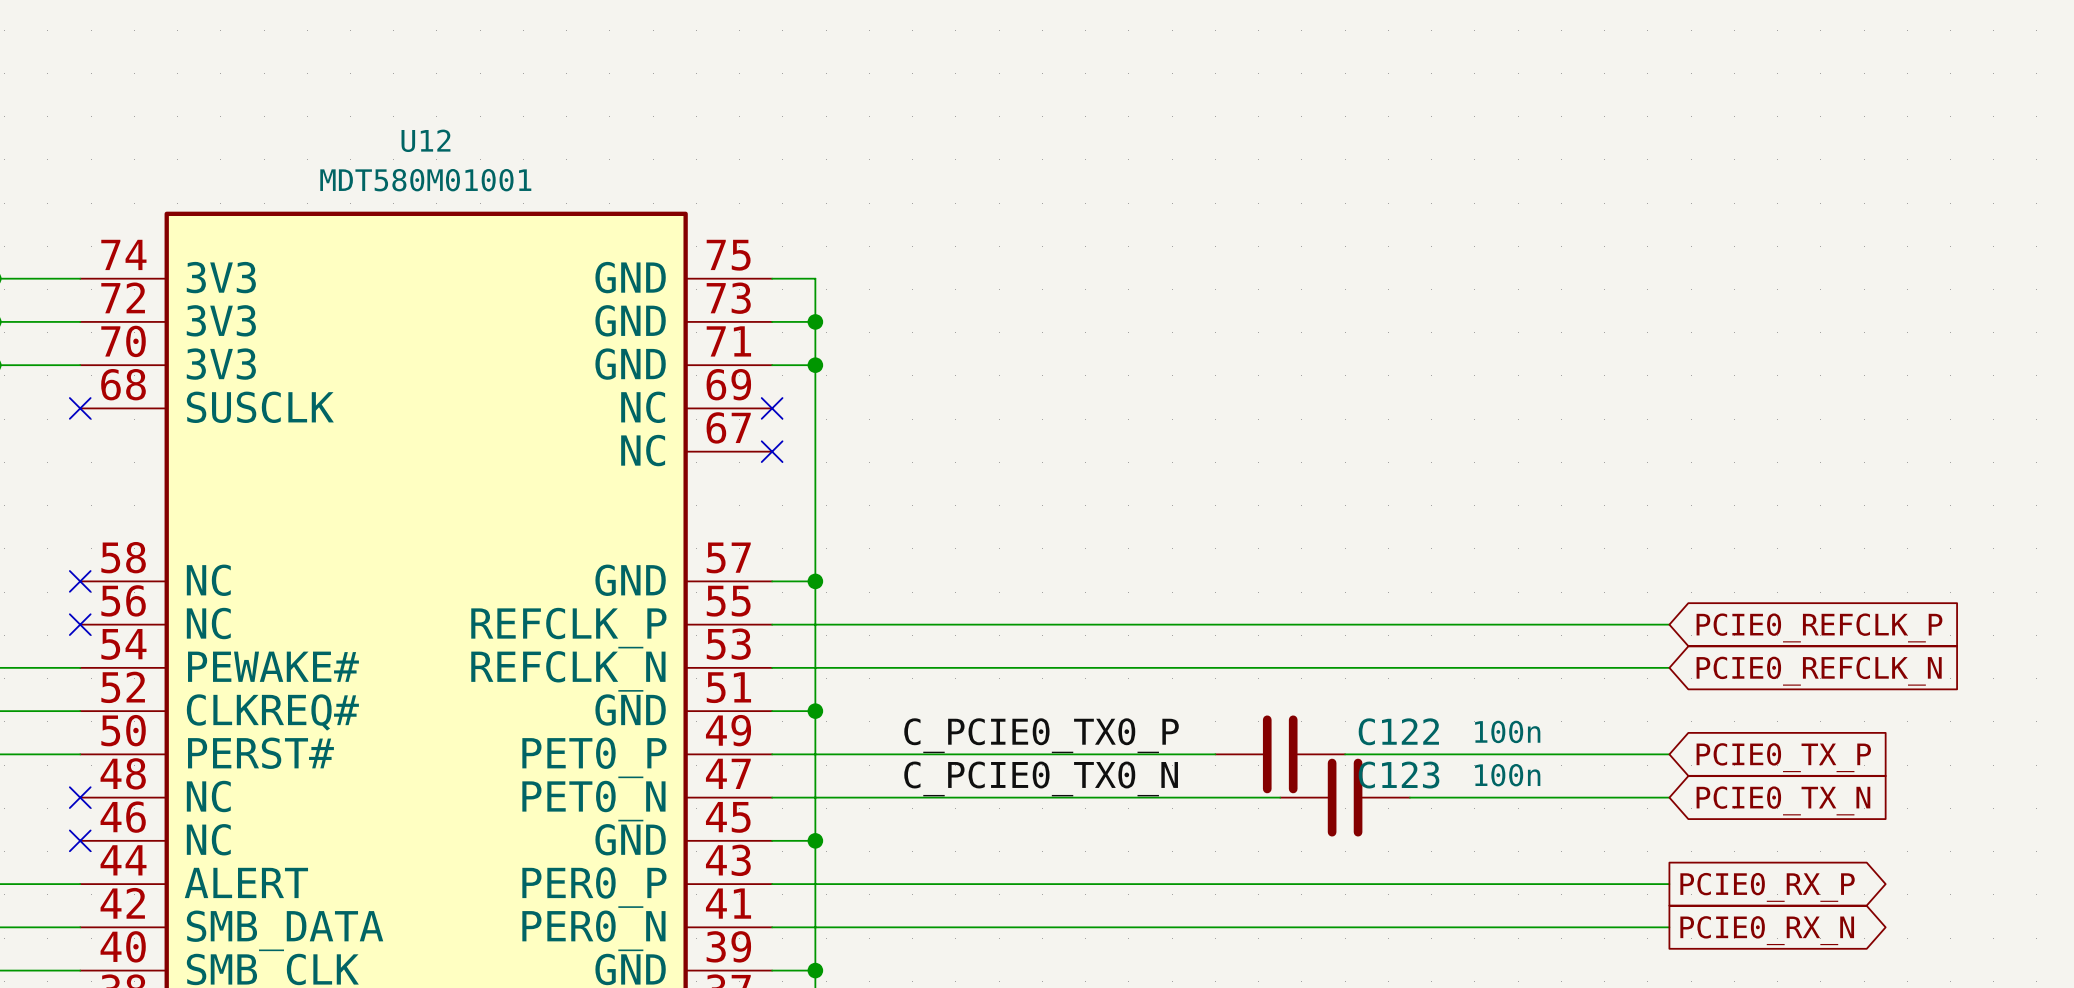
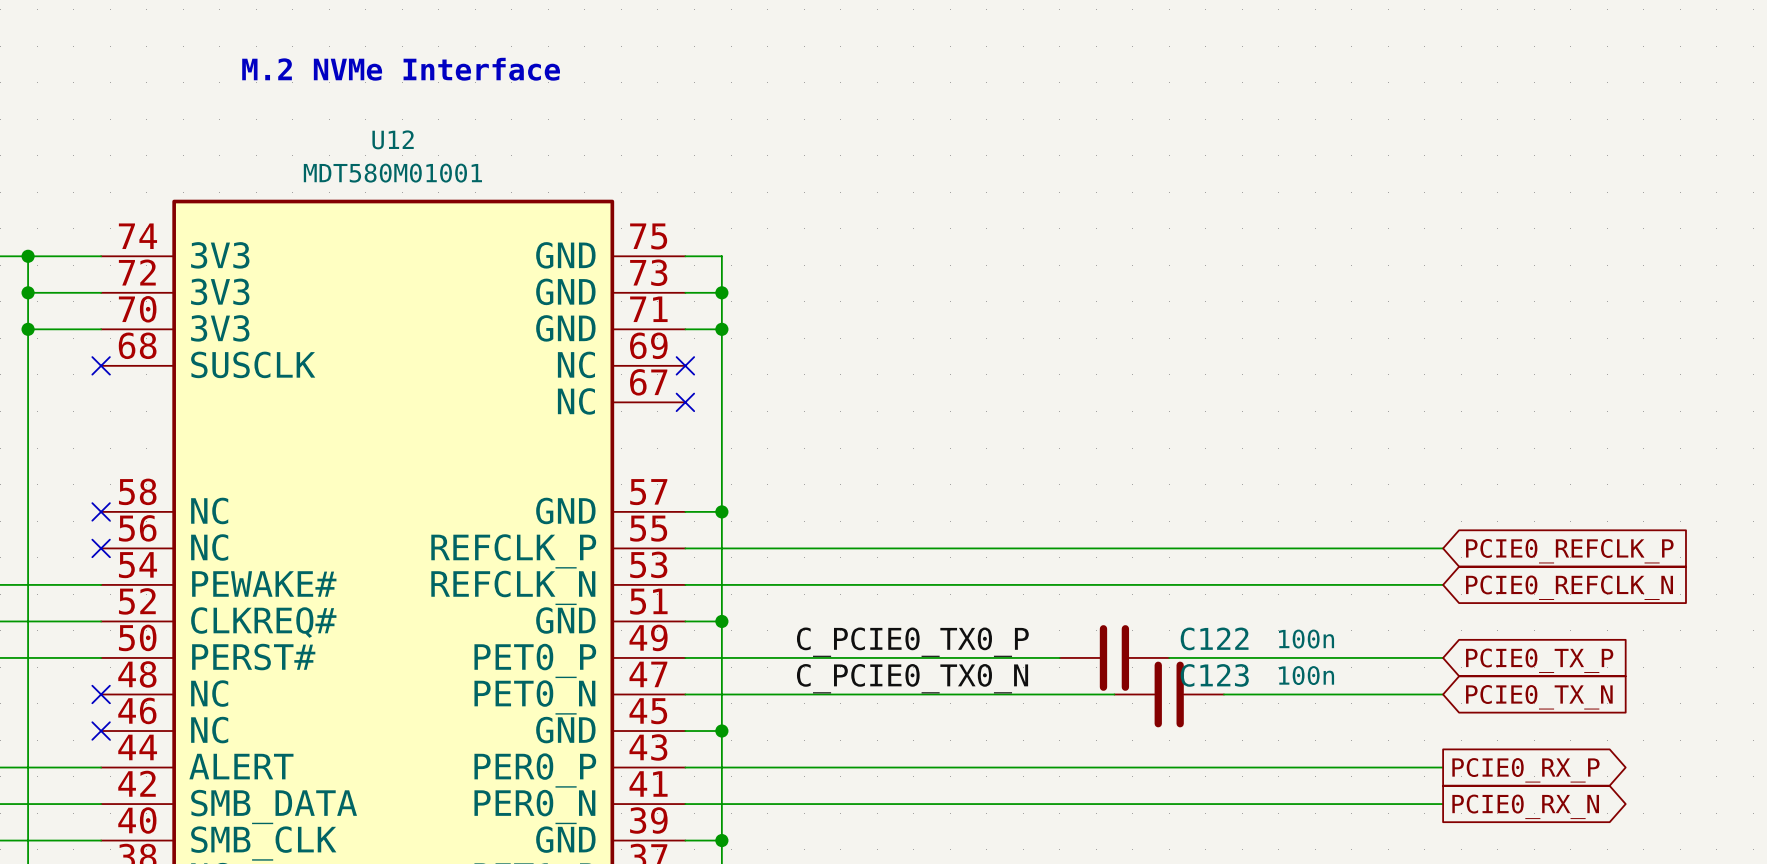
text: none -> M.2 NVMe Interface (401, 69)

